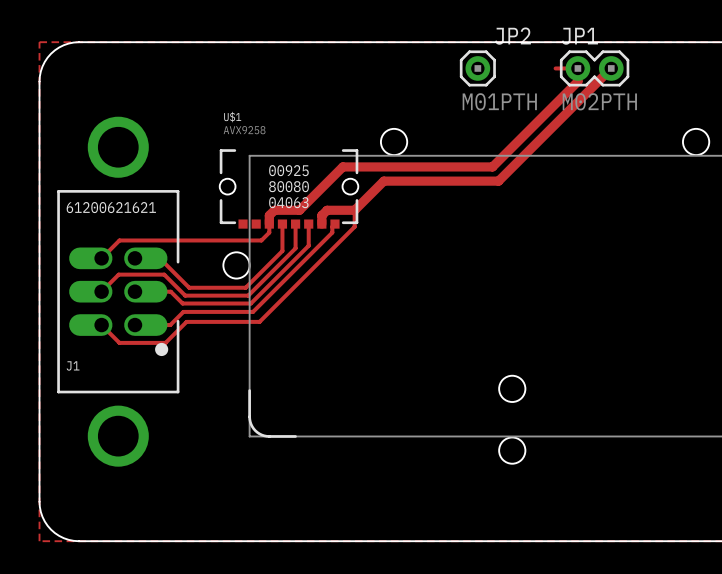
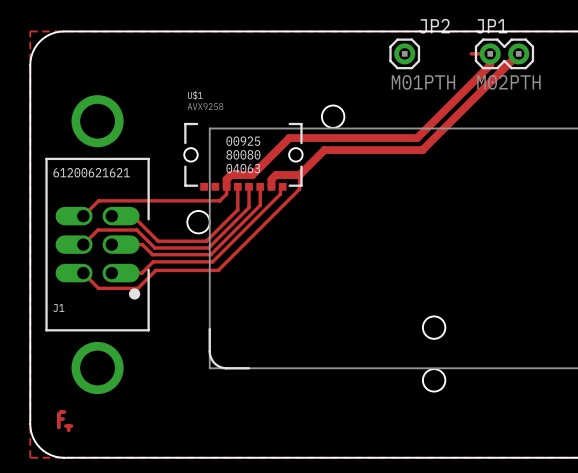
drawing: none -> [57, 410, 74, 433]

